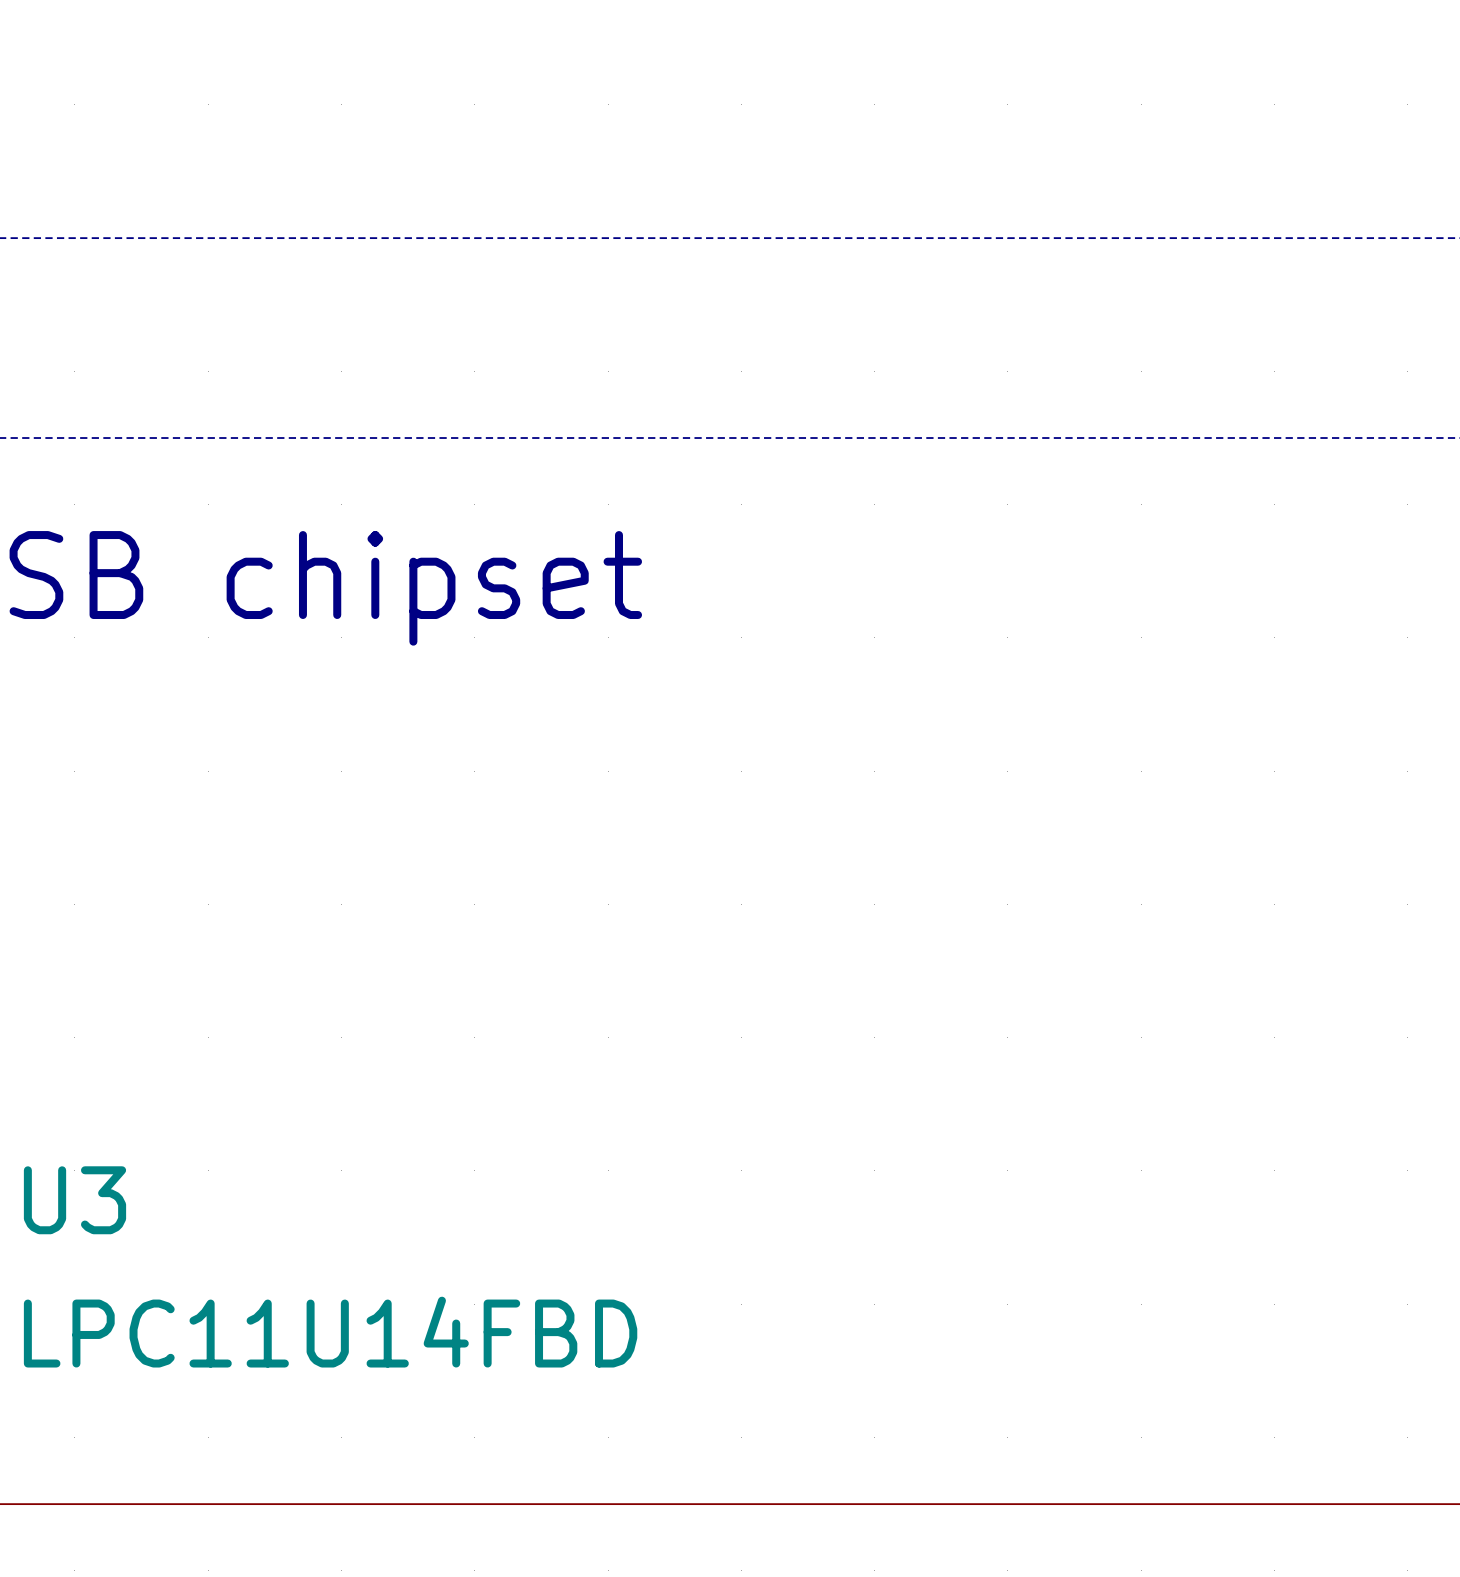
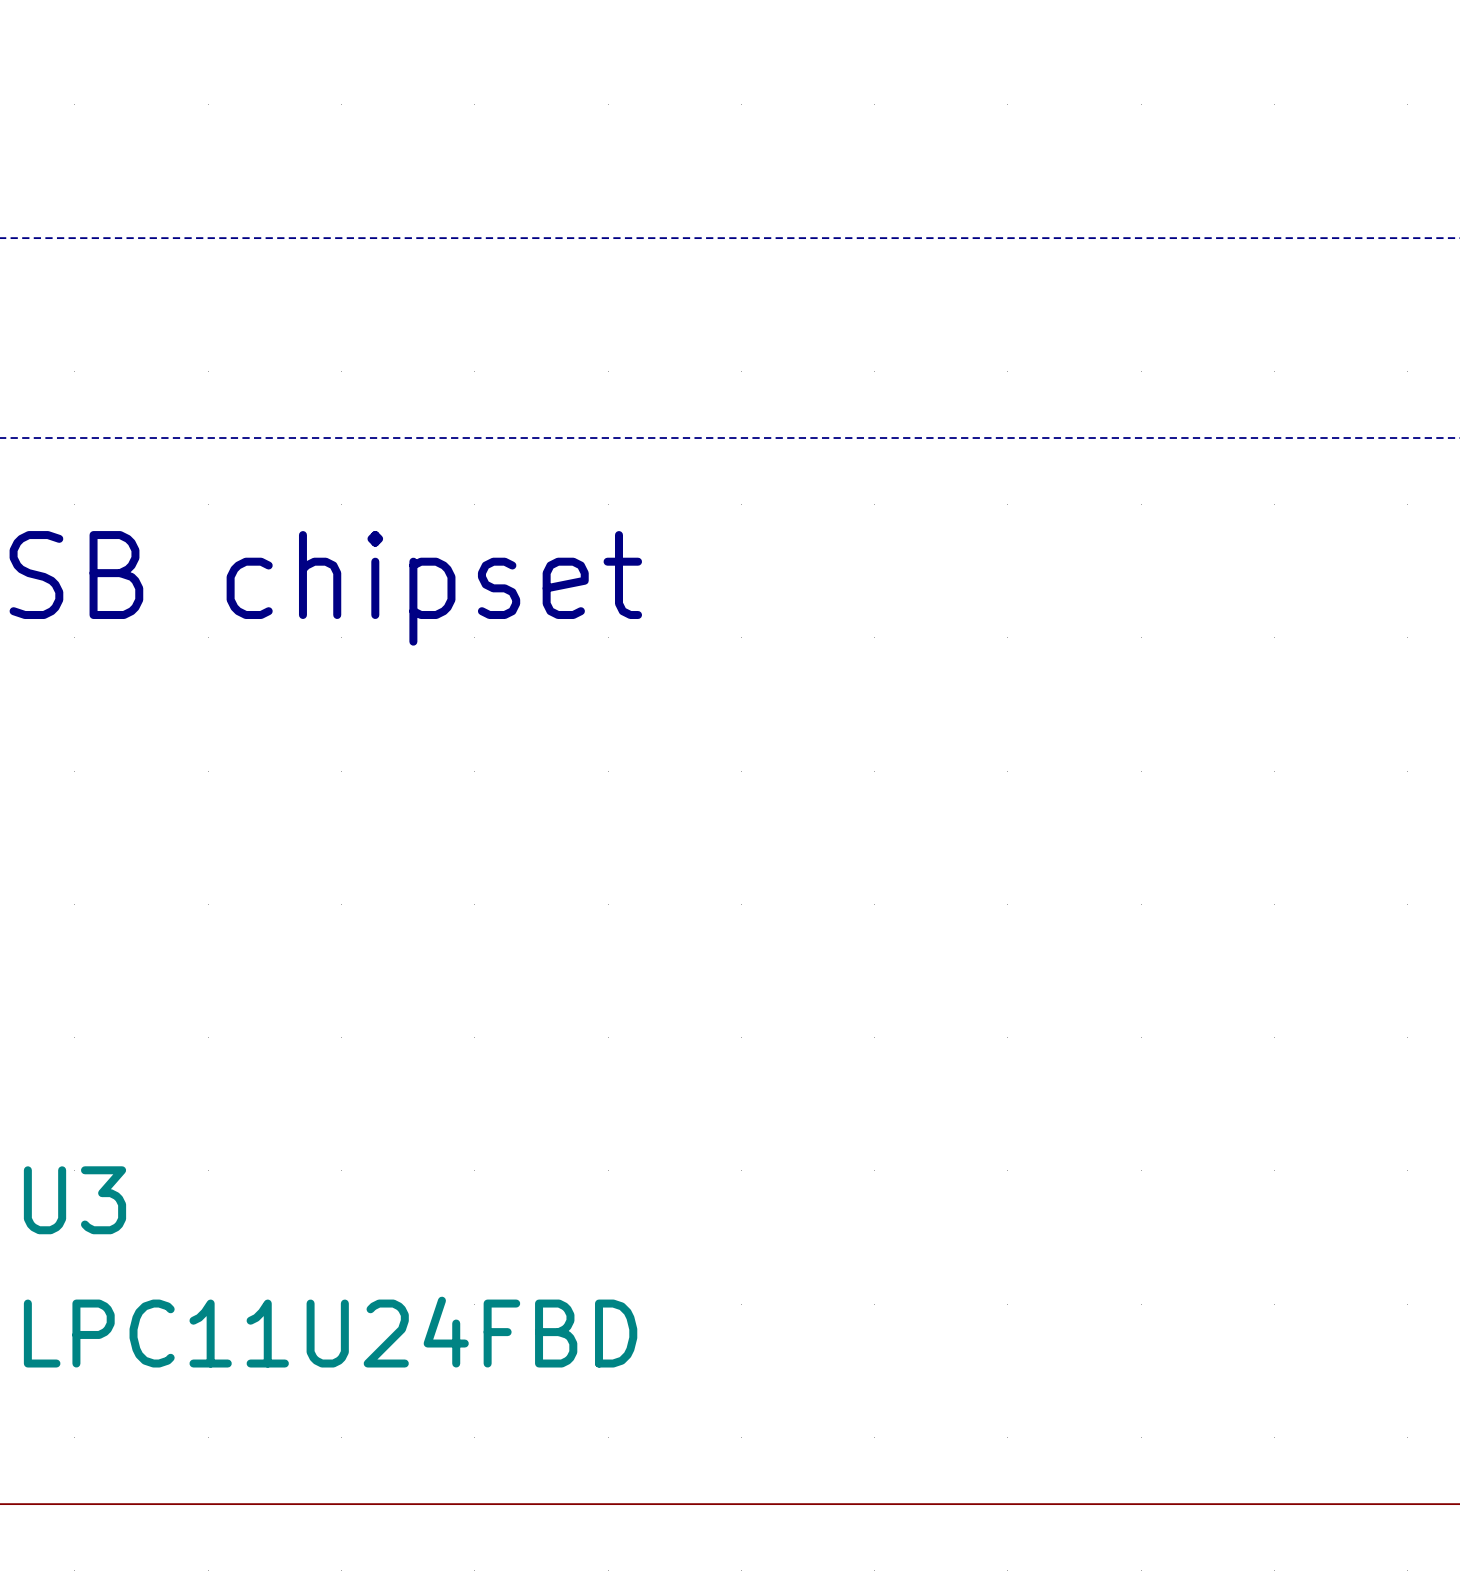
U3 value: LPC11U14FBD (330, 1332) -> LPC11U24FBD (330, 1332)

